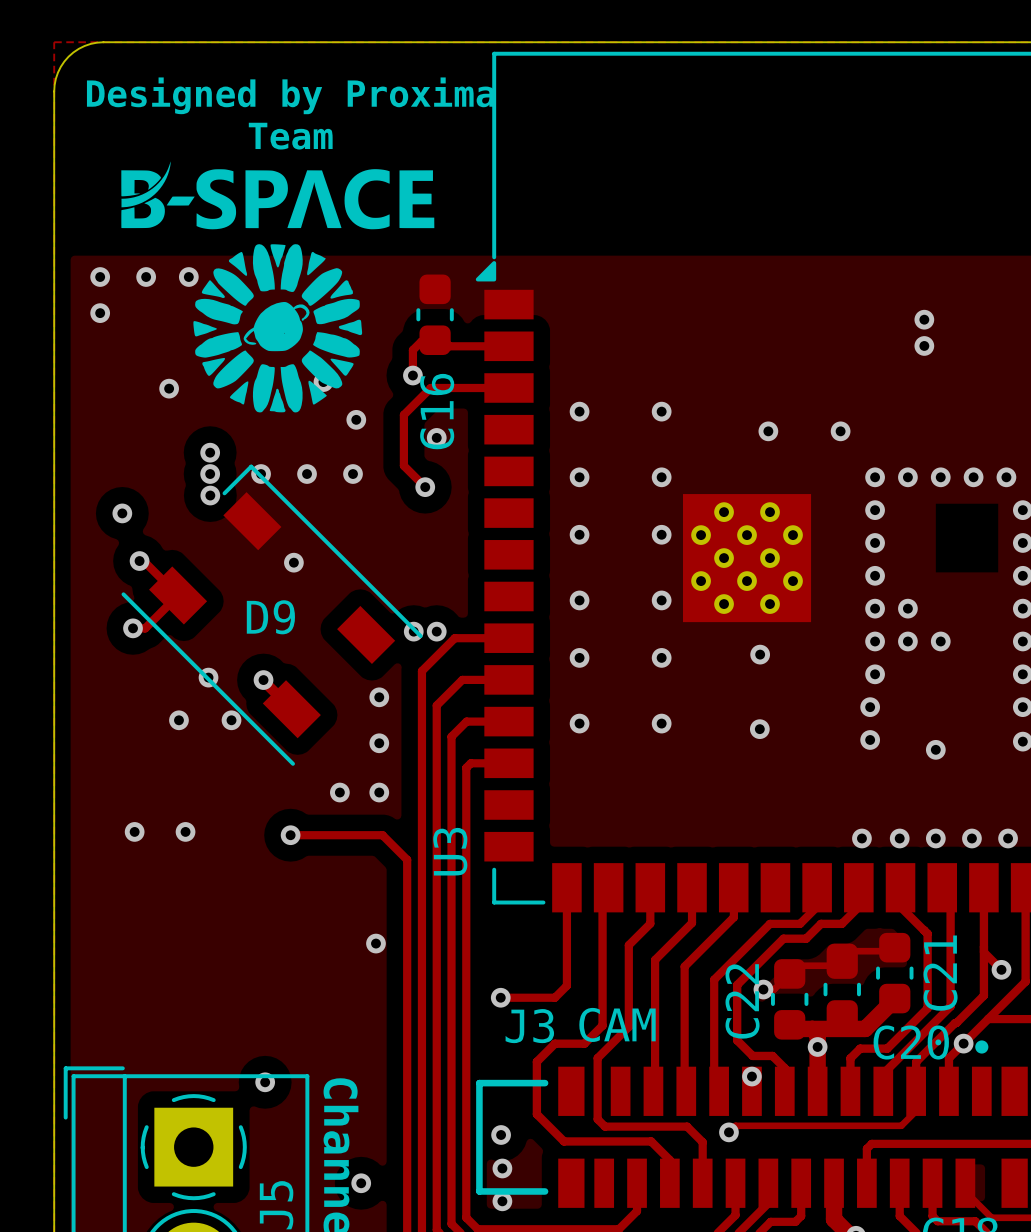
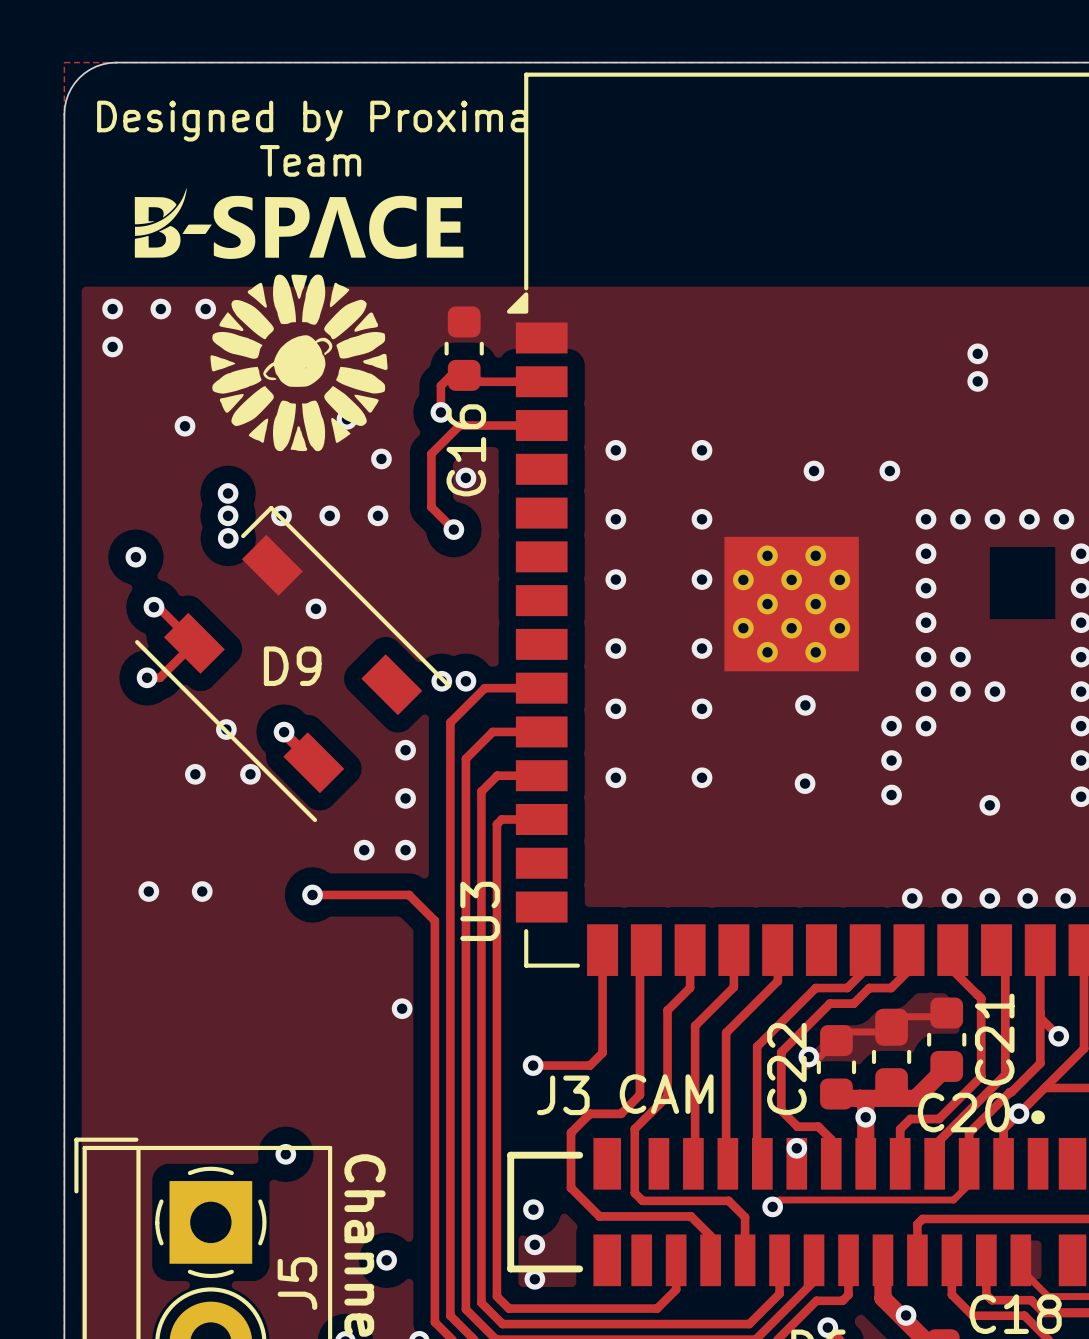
via: none -> (891, 726)
via: none -> (891, 760)
via: (870, 707) -> none
via: none -> (891, 795)
via: (870, 739) -> none

